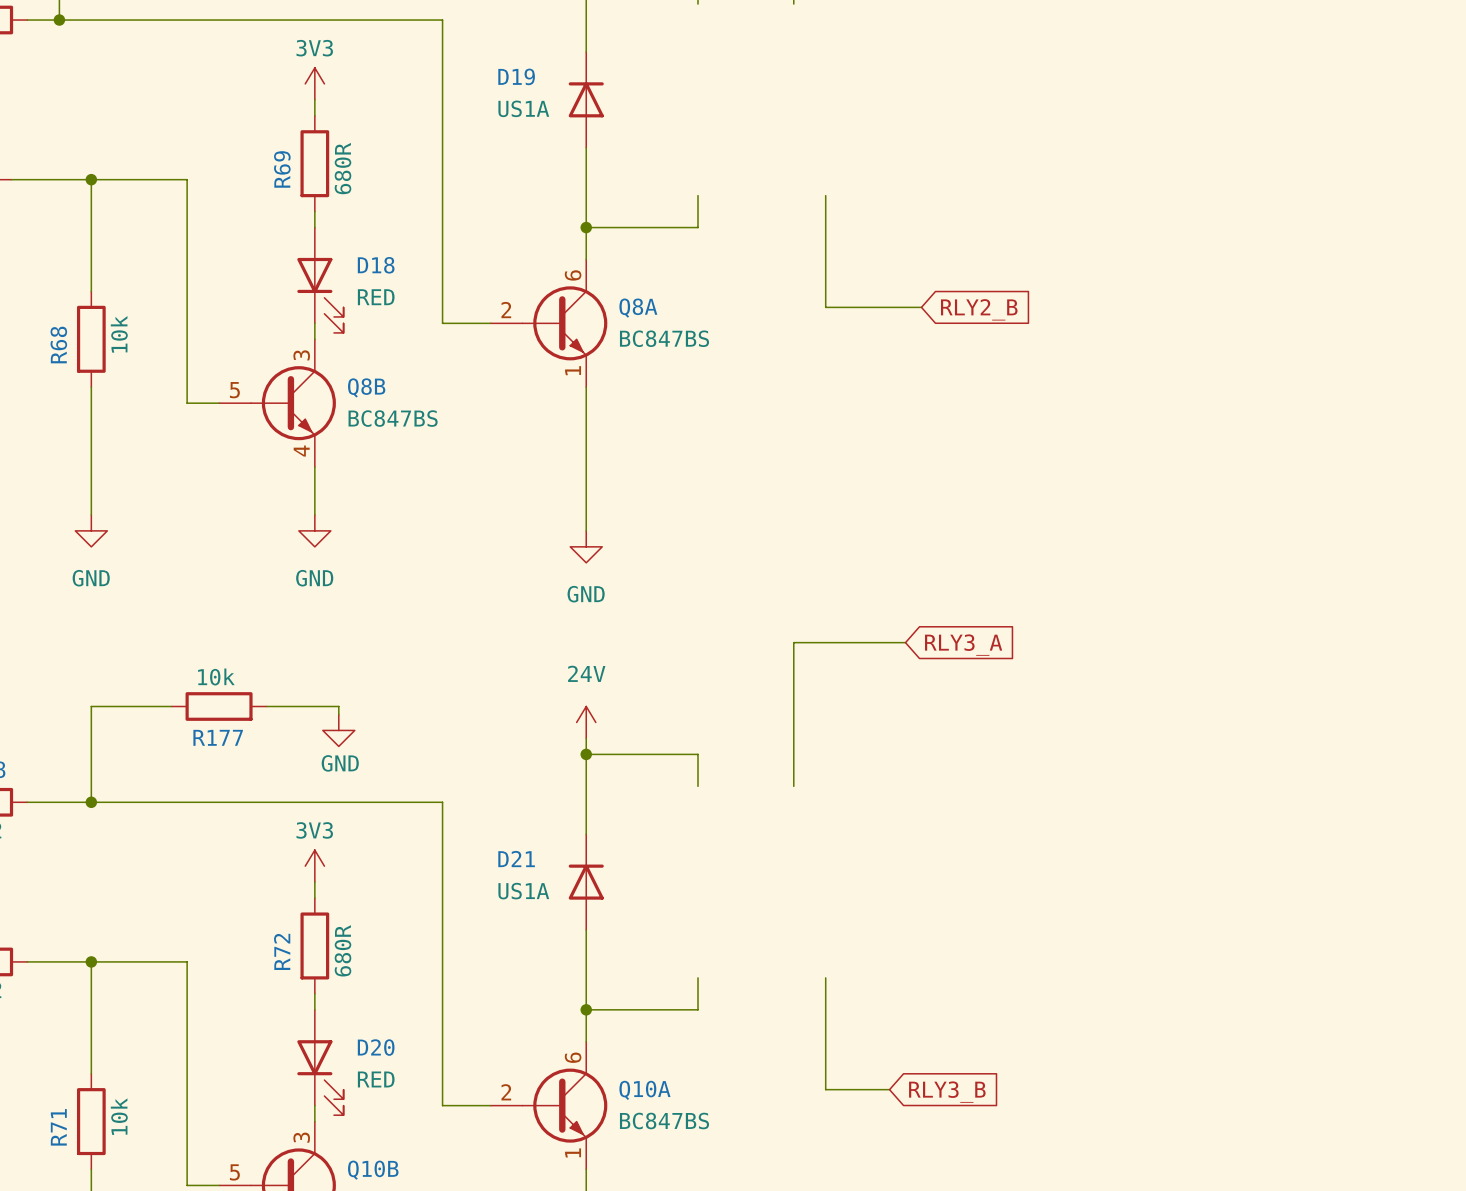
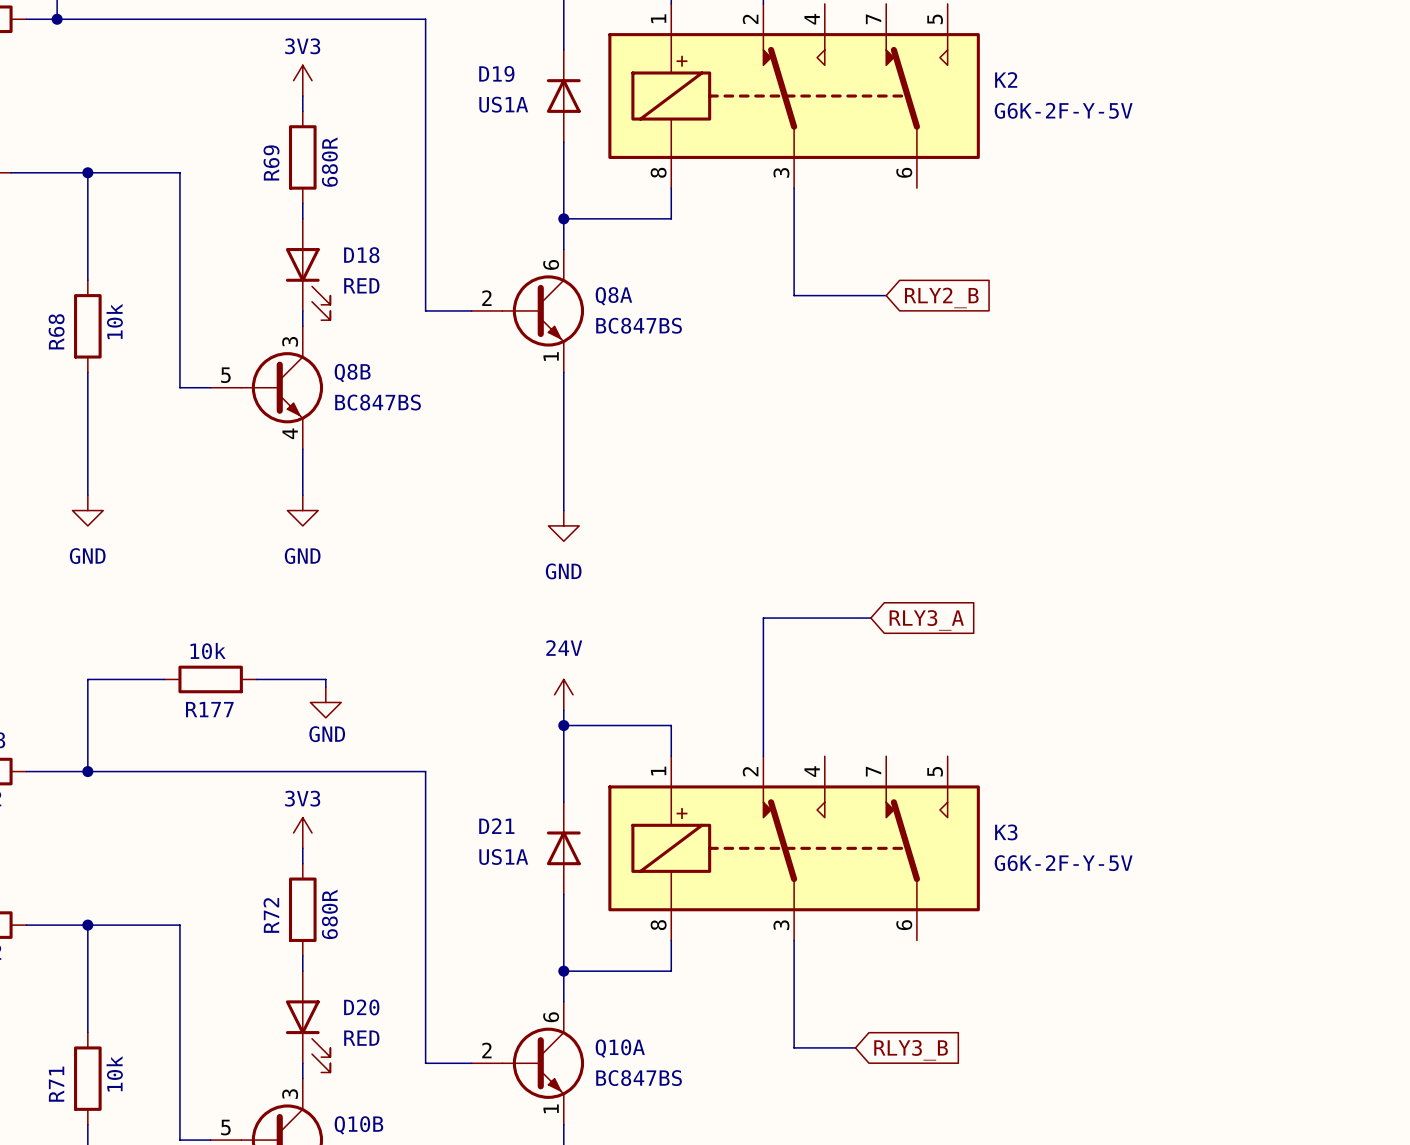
K2: none -> G6K-2F-Y-5V (794, 96)
K3: none -> G6K-2F-Y-5V (794, 848)

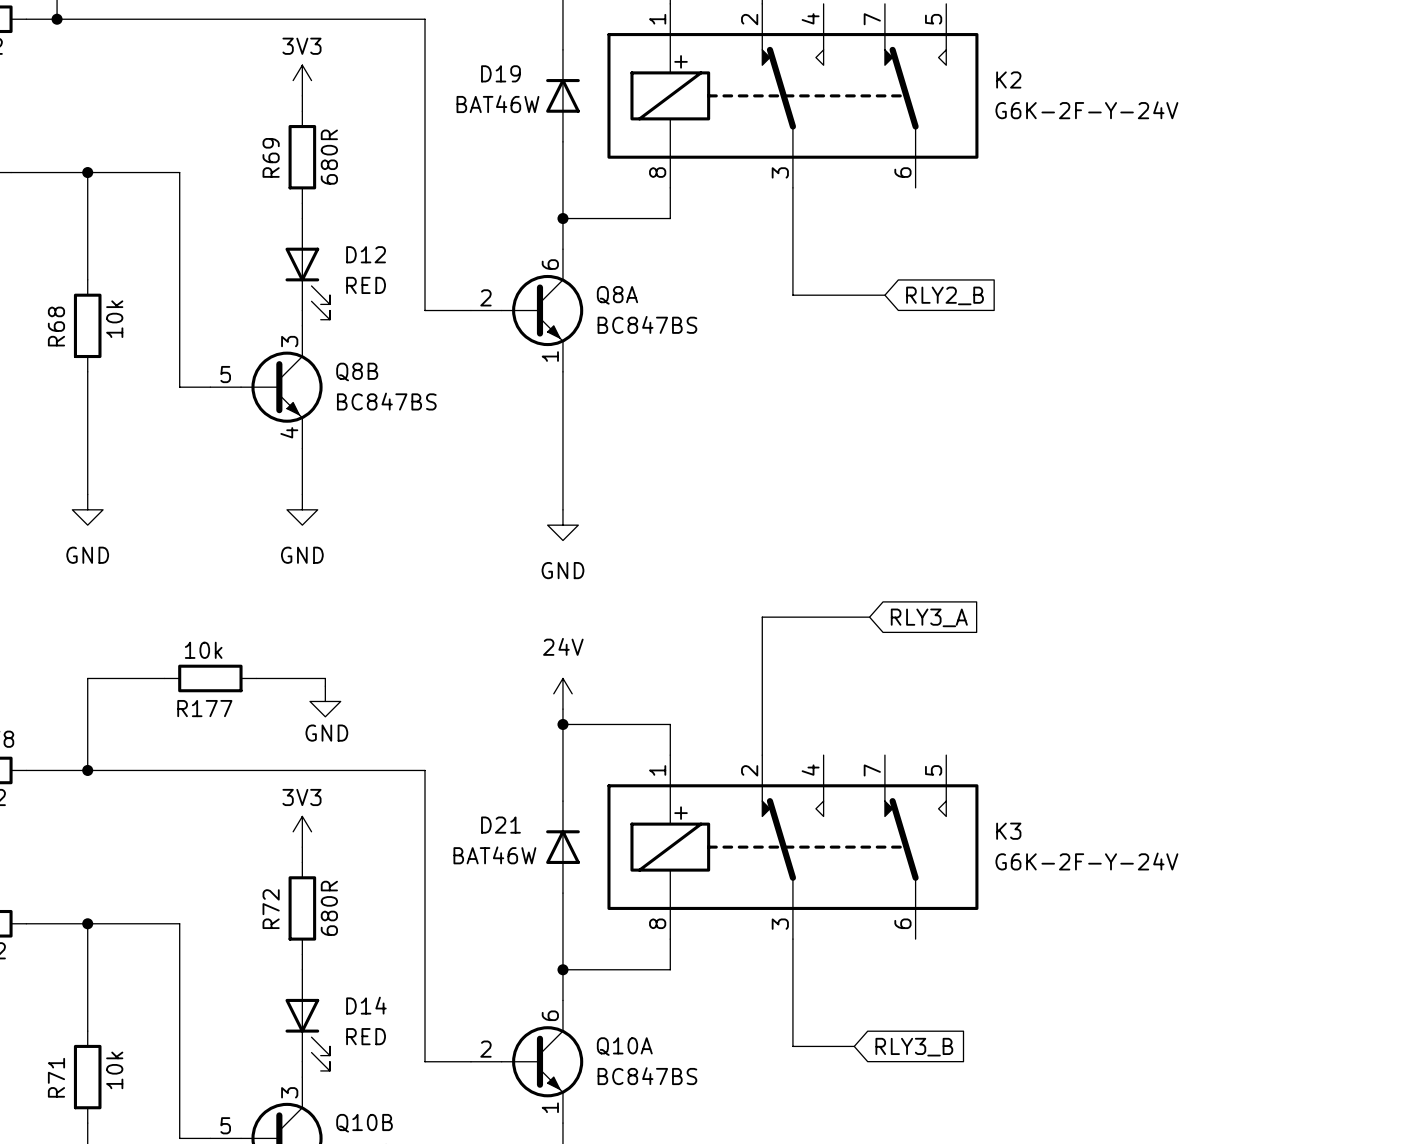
D19 value: US1A (503, 104) -> BAT46W (497, 104)
K2 value: G6K-2F-Y-5V (1063, 110) -> G6K-2F-Y-24V (1086, 110)
D18 name: D18 (361, 255) -> D12 (366, 254)
D21 value: US1A (503, 856) -> BAT46W (494, 855)
K3 value: G6K-2F-Y-5V (1063, 863) -> G6K-2F-Y-24V (1086, 861)
D20 name: D20 (361, 1007) -> D14 (366, 1005)

